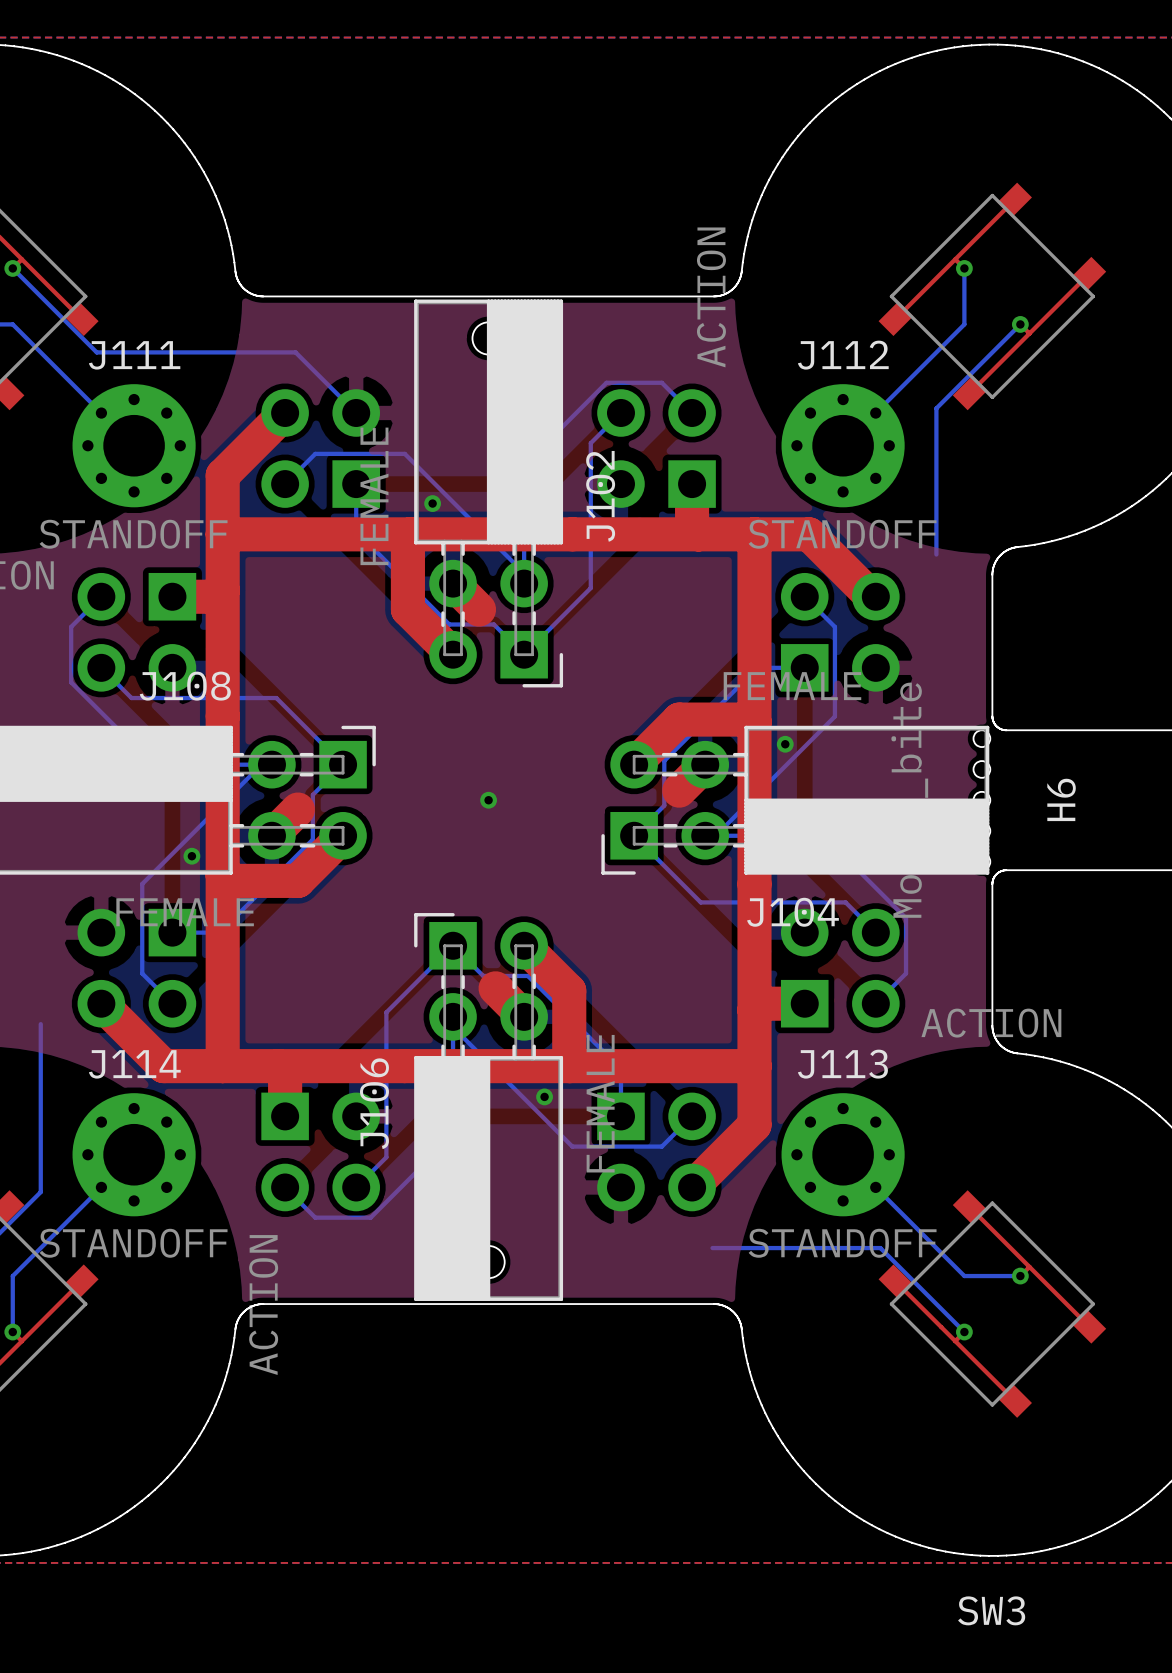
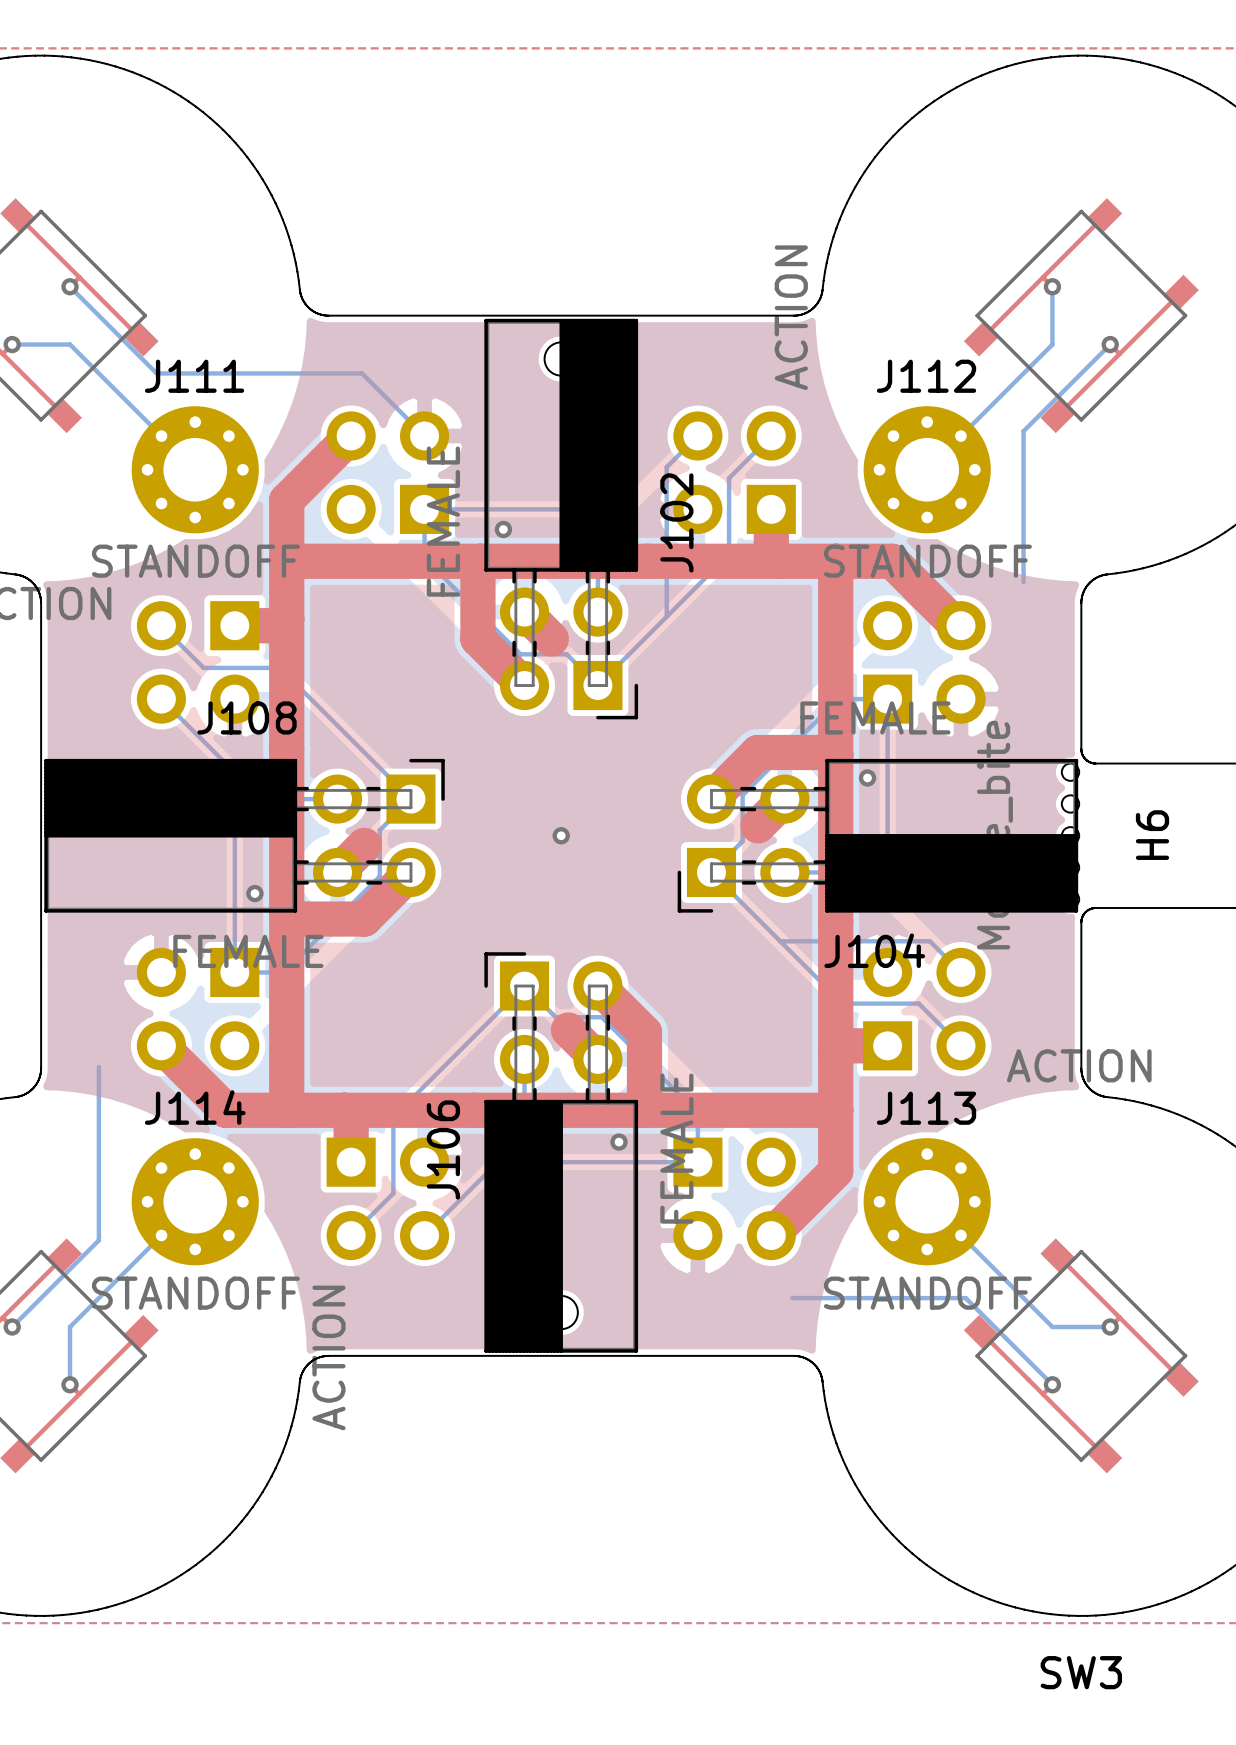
bottom track: (692, 412) (661, 382) (606, 382) (524, 465) (524, 509) -> (771, 435) (729, 478) (729, 554) (666, 616)
bottom track: (285, 484) (315, 453) (404, 453) (524, 573) -> none
bottom track: none -> (424, 509) (567, 509) (597, 540)
bottom track: (101, 596) (71, 626) (71, 682) (153, 764) (198, 764) -> (161, 625) (203, 667) (279, 667) (342, 730)
bottom track: (804, 596) (834, 626) (834, 716) (715, 835) -> none
bottom track: none -> (887, 699) (887, 842) (857, 872)
bottom track: (131, 698) (276, 698) -> (192, 730) (261, 799) (234, 825) (234, 972)
bottom track: (261, 764) (142, 883) (142, 973) (172, 1003) -> none
bottom track: (779, 835) (823, 835) (906, 918) (906, 973) (875, 1003) -> (780, 941) (842, 1003) (918, 1003) (961, 1045)
bottom track: (386, 1012) (386, 1157) -> (697, 1162) (551, 1162) (524, 1135) (455, 1204)
bottom track: (453, 1027) (572, 1146) (661, 1146) (692, 1116) -> none
bottom track: (453, 1090) (453, 1135) (370, 1217) (315, 1217) (285, 1187) -> (455, 1054) (393, 1117) (393, 1193) (351, 1235)

